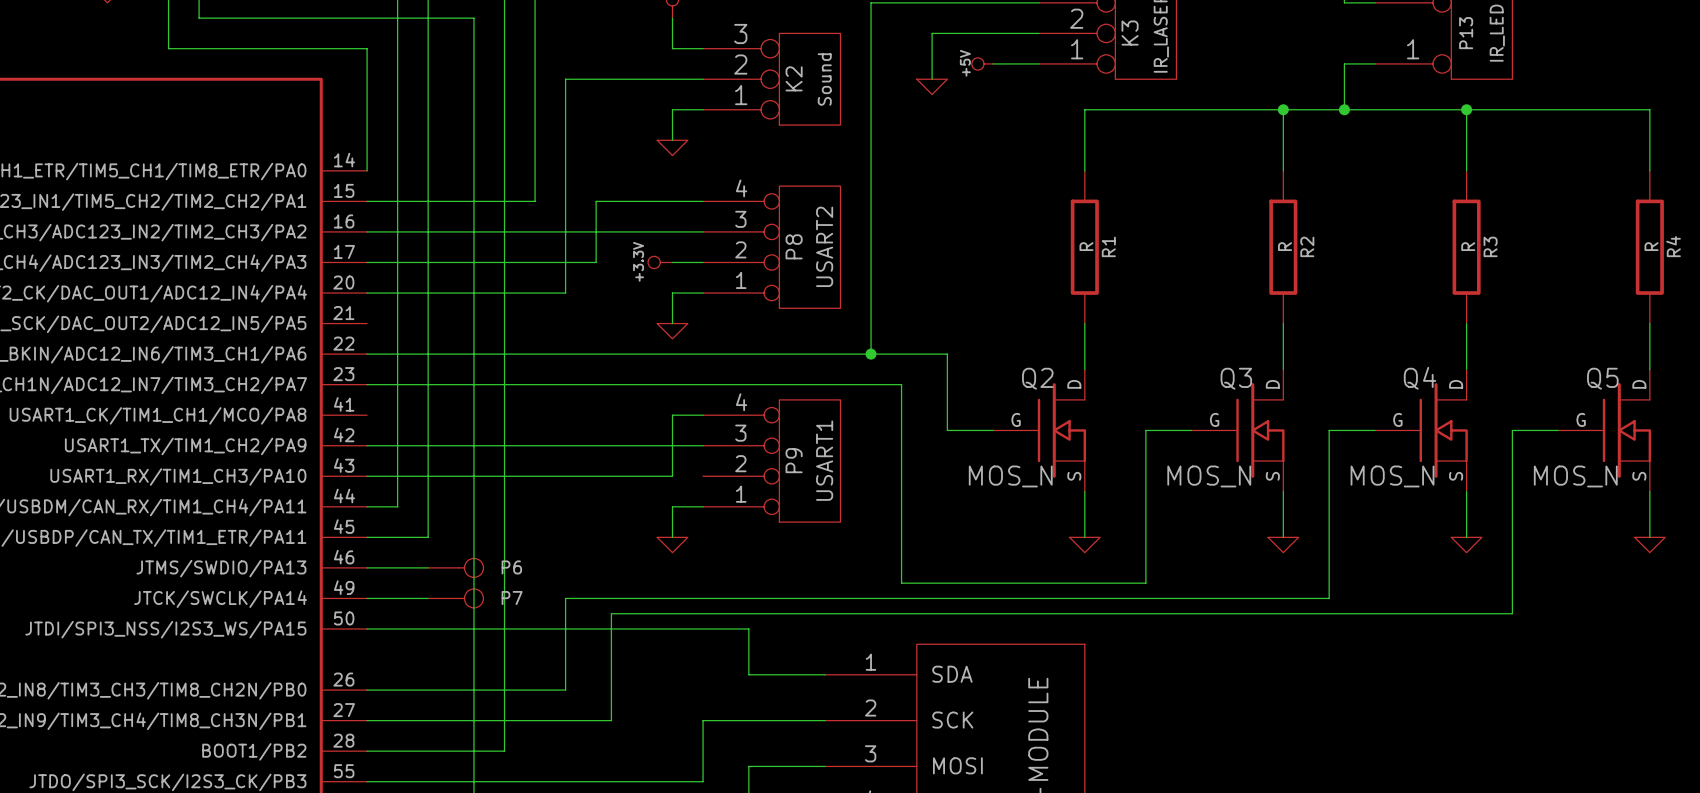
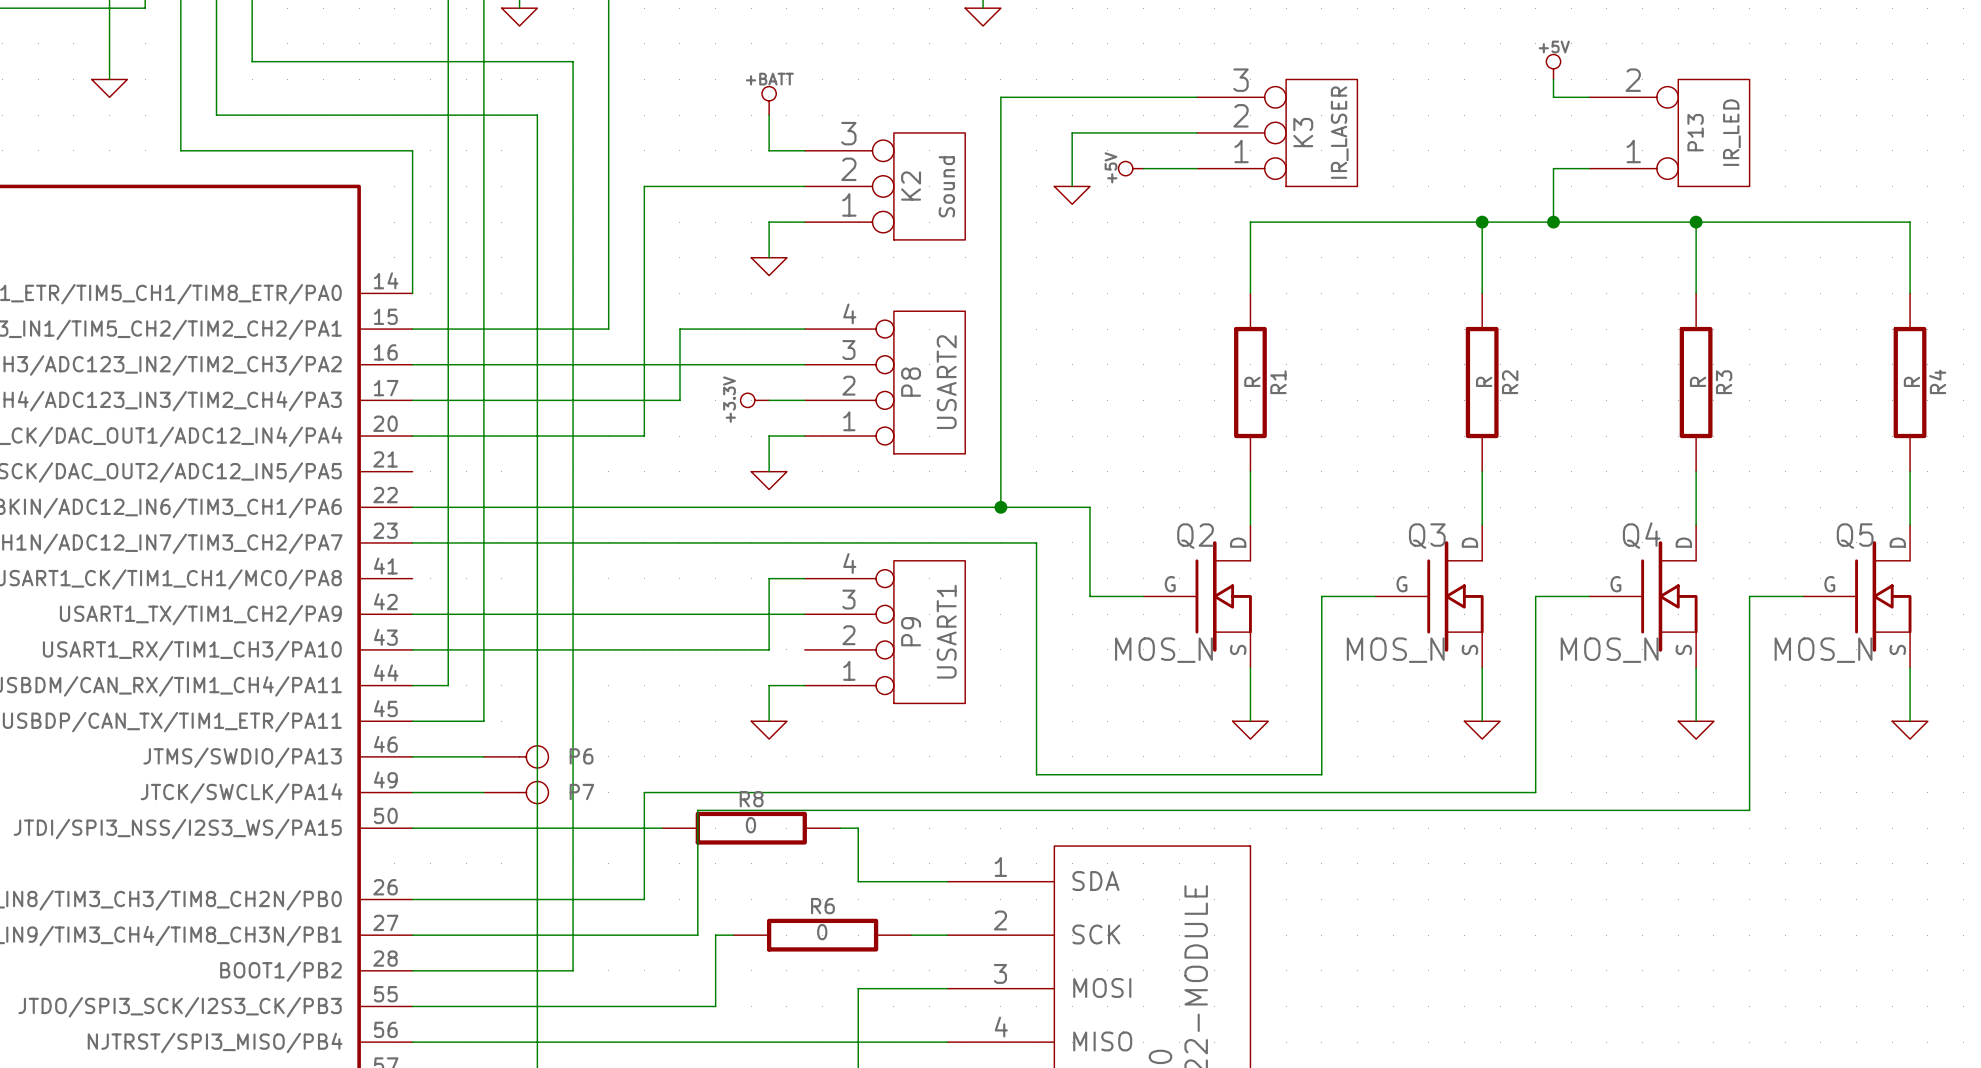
wire: (580, 628) (733, 628) -> none
R8: none -> 0 (751, 828)
R6: none -> 0 (822, 935)
wire: (794, 720) (703, 720) (703, 781) (626, 781) -> (733, 935) (715, 935) (715, 1006)

